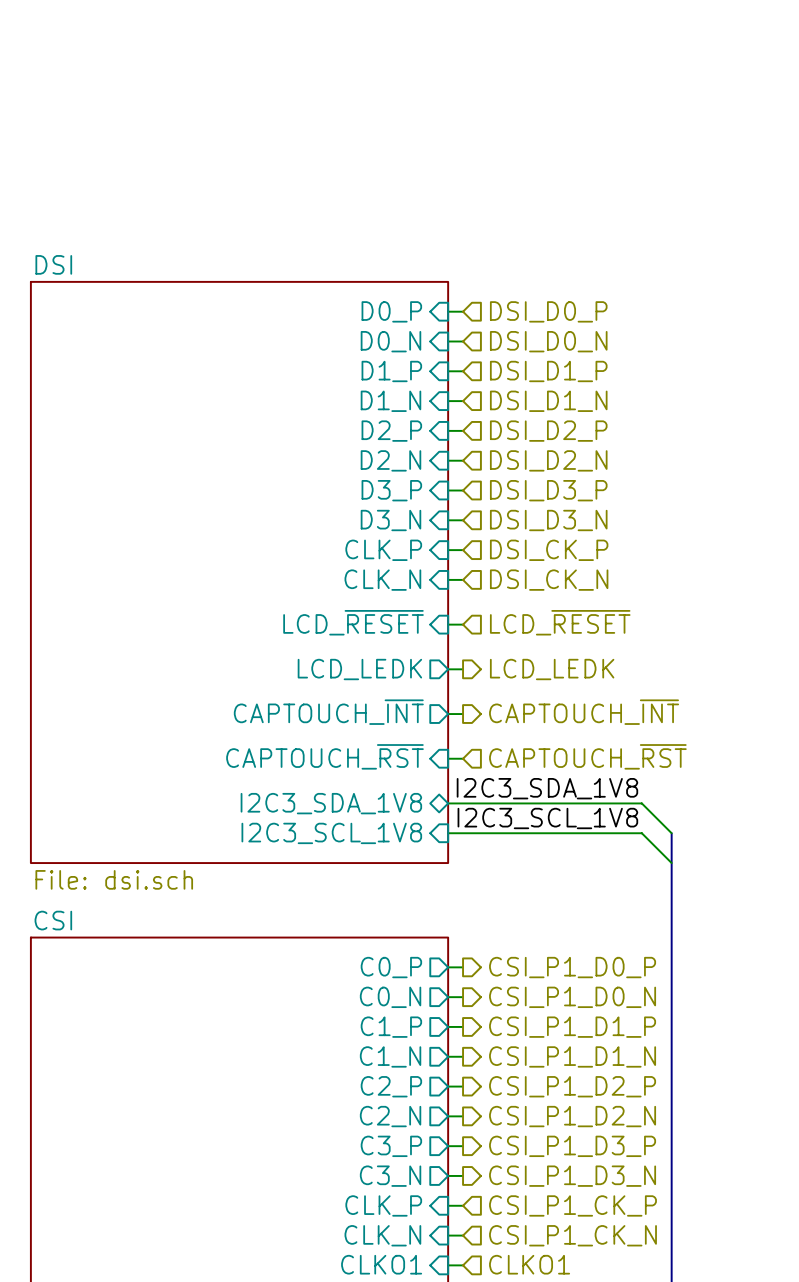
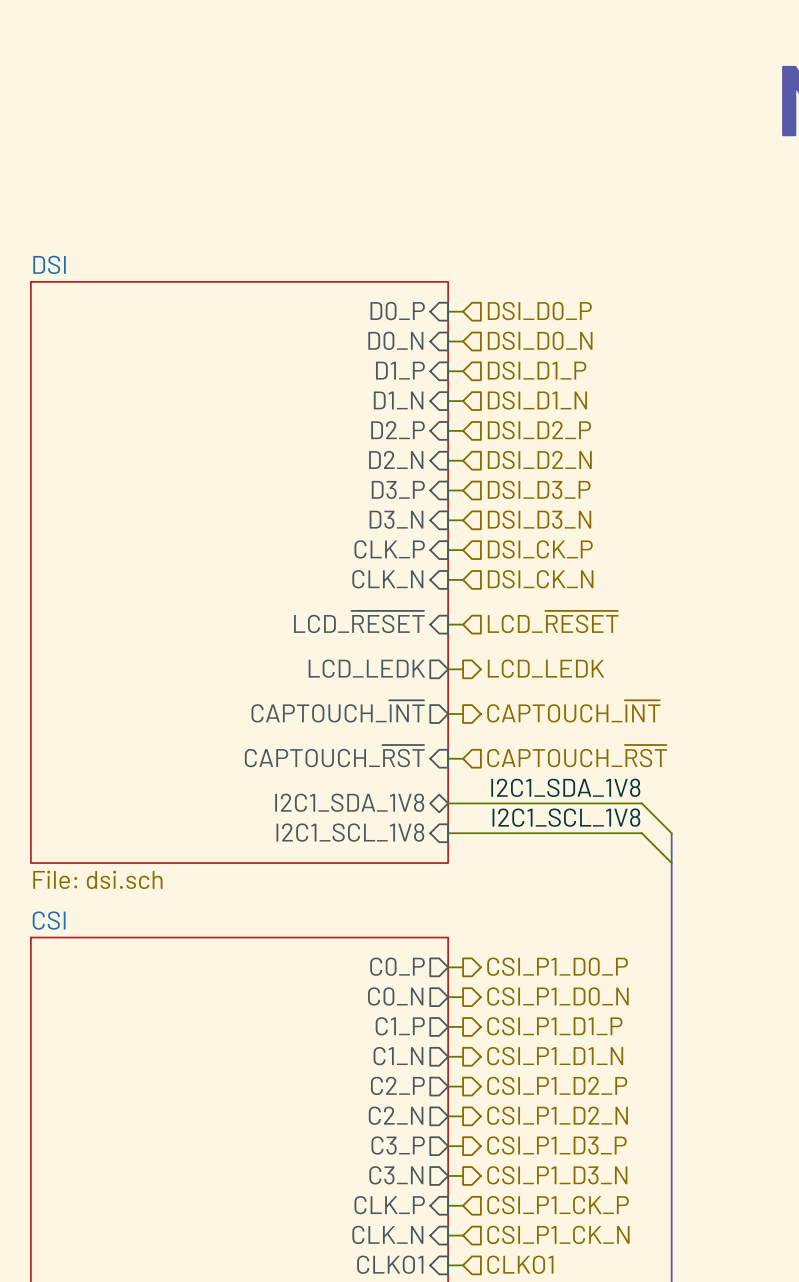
label: I2C3_SDA_1V8 (547, 788) -> I2C1_SDA_1V8 (565, 787)
sheet pin: I2C3_SDA_1V8 (331, 803) -> I2C1_SDA_1V8 (349, 802)
label: I2C3_SCL_1V8 (547, 818) -> I2C1_SCL_1V8 (566, 817)
sheet pin: I2C3_SCL_1V8 (331, 833) -> I2C1_SCL_1V8 (350, 832)

